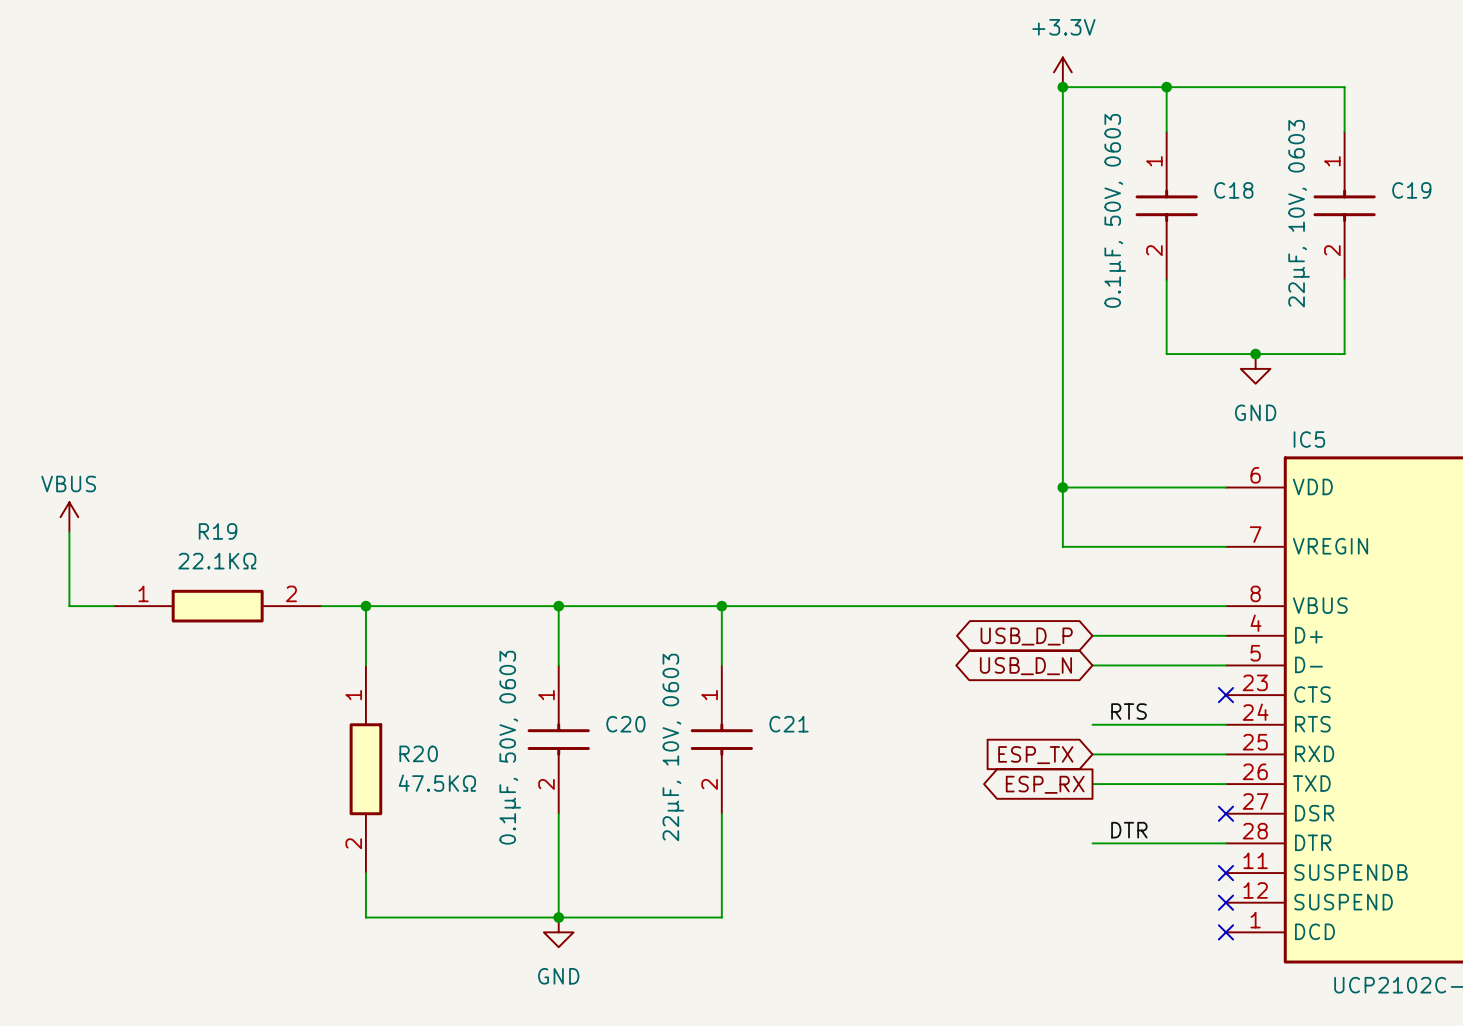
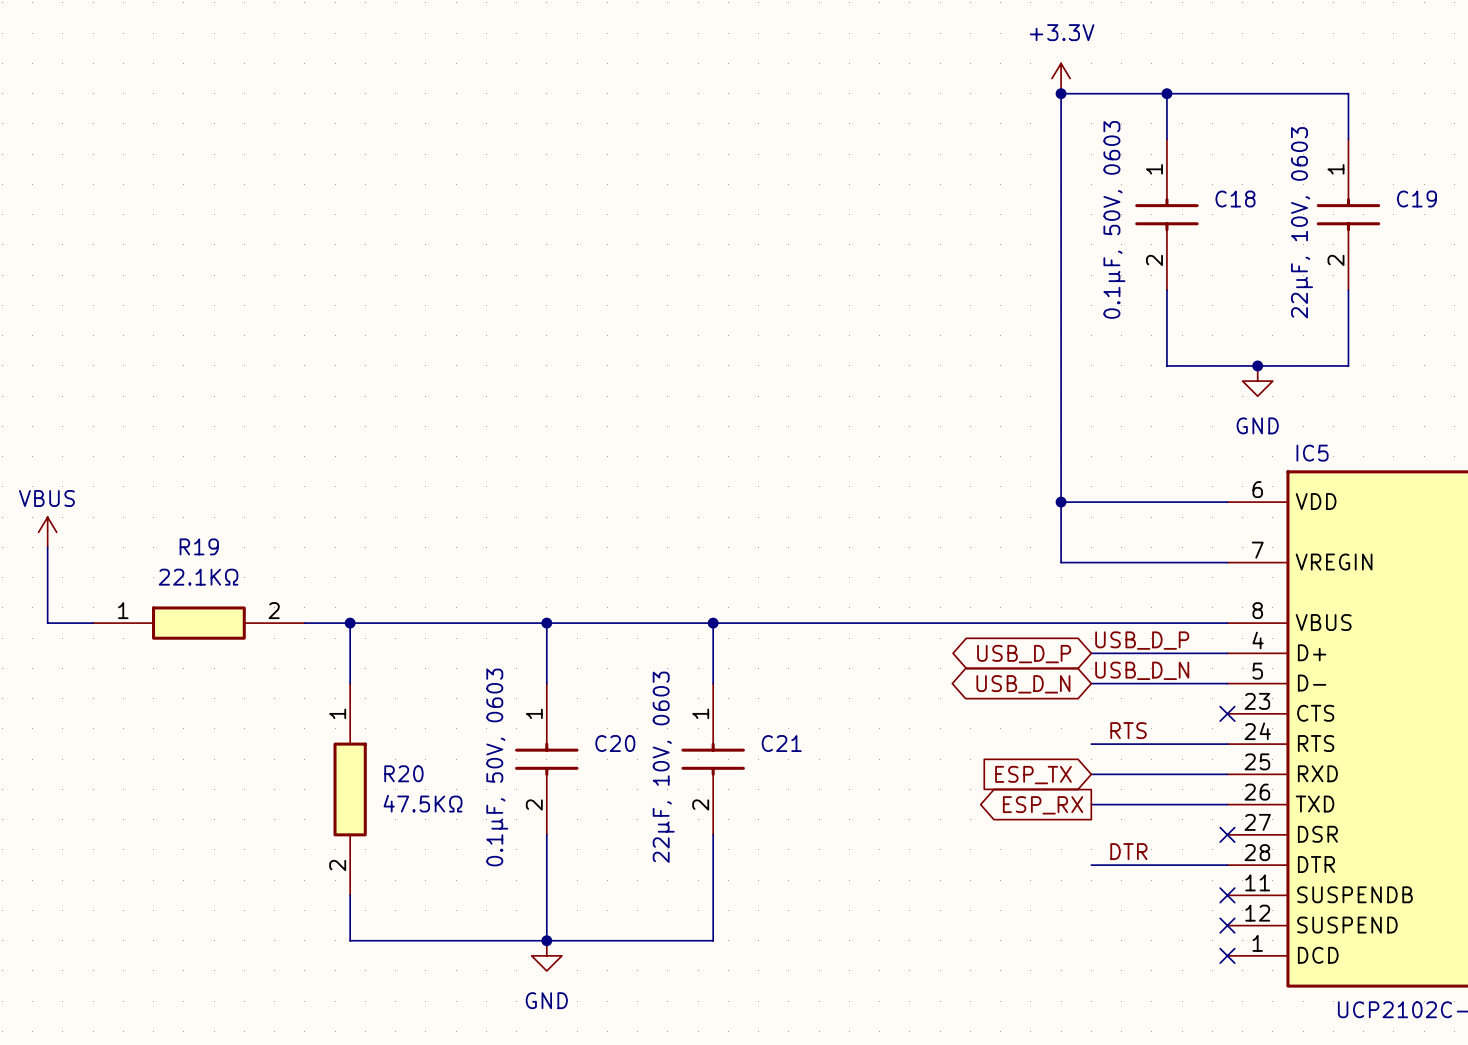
label: none -> USB_D_P (1142, 640)
label: none -> USB_D_N (1142, 670)

